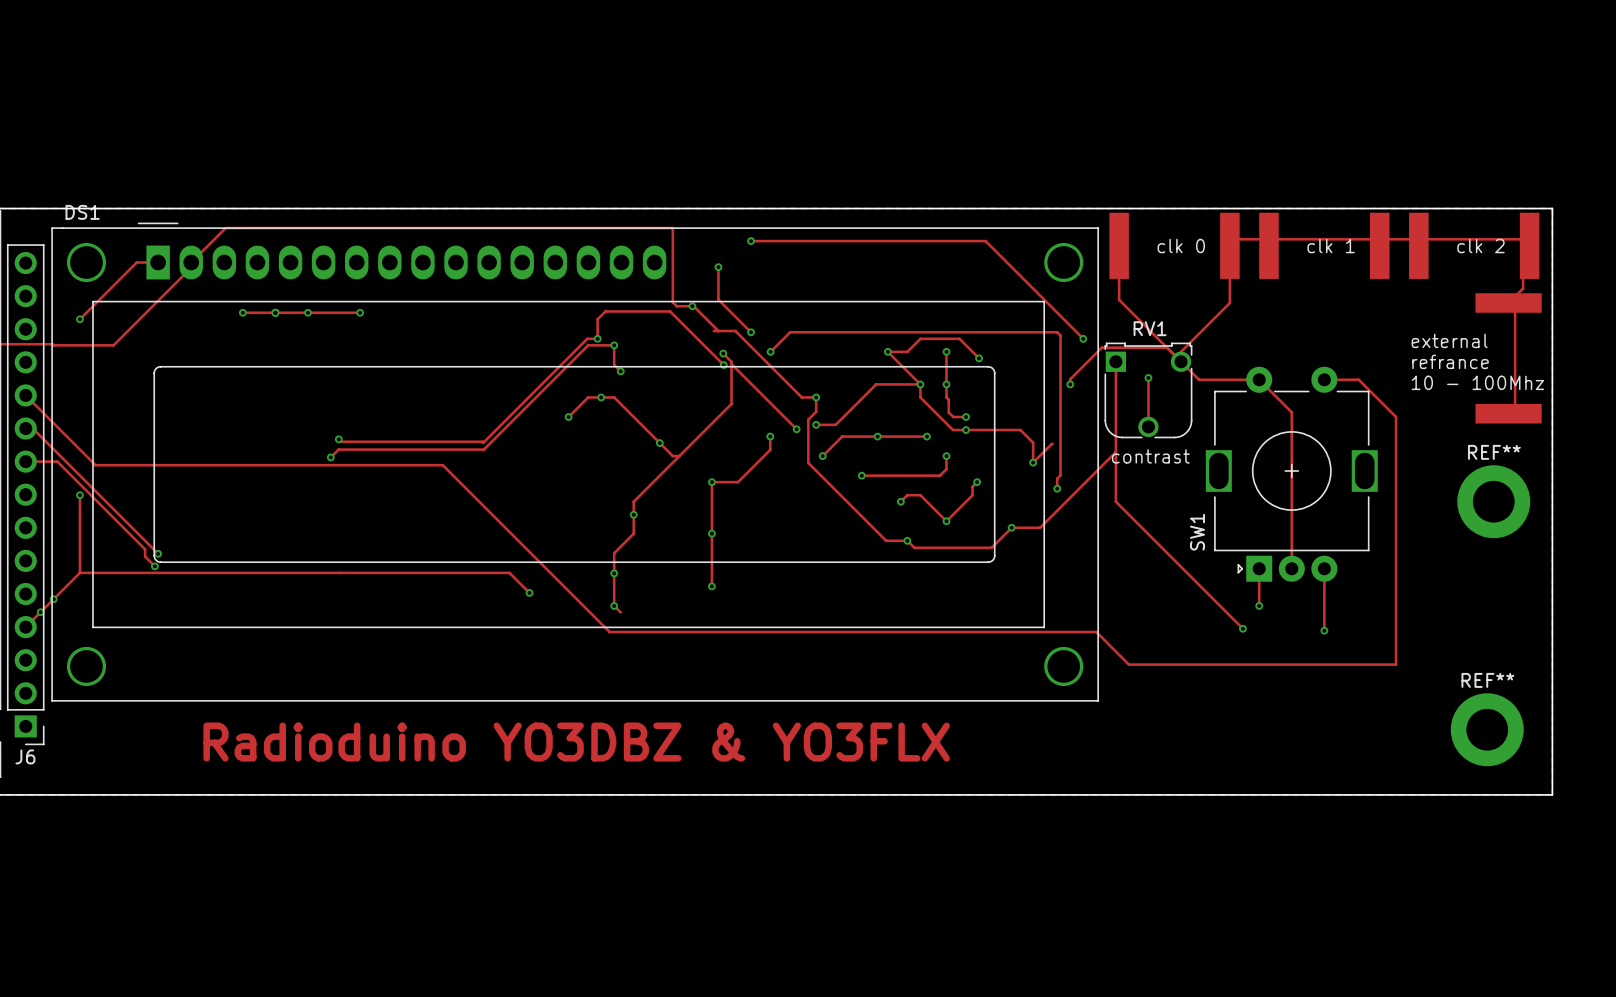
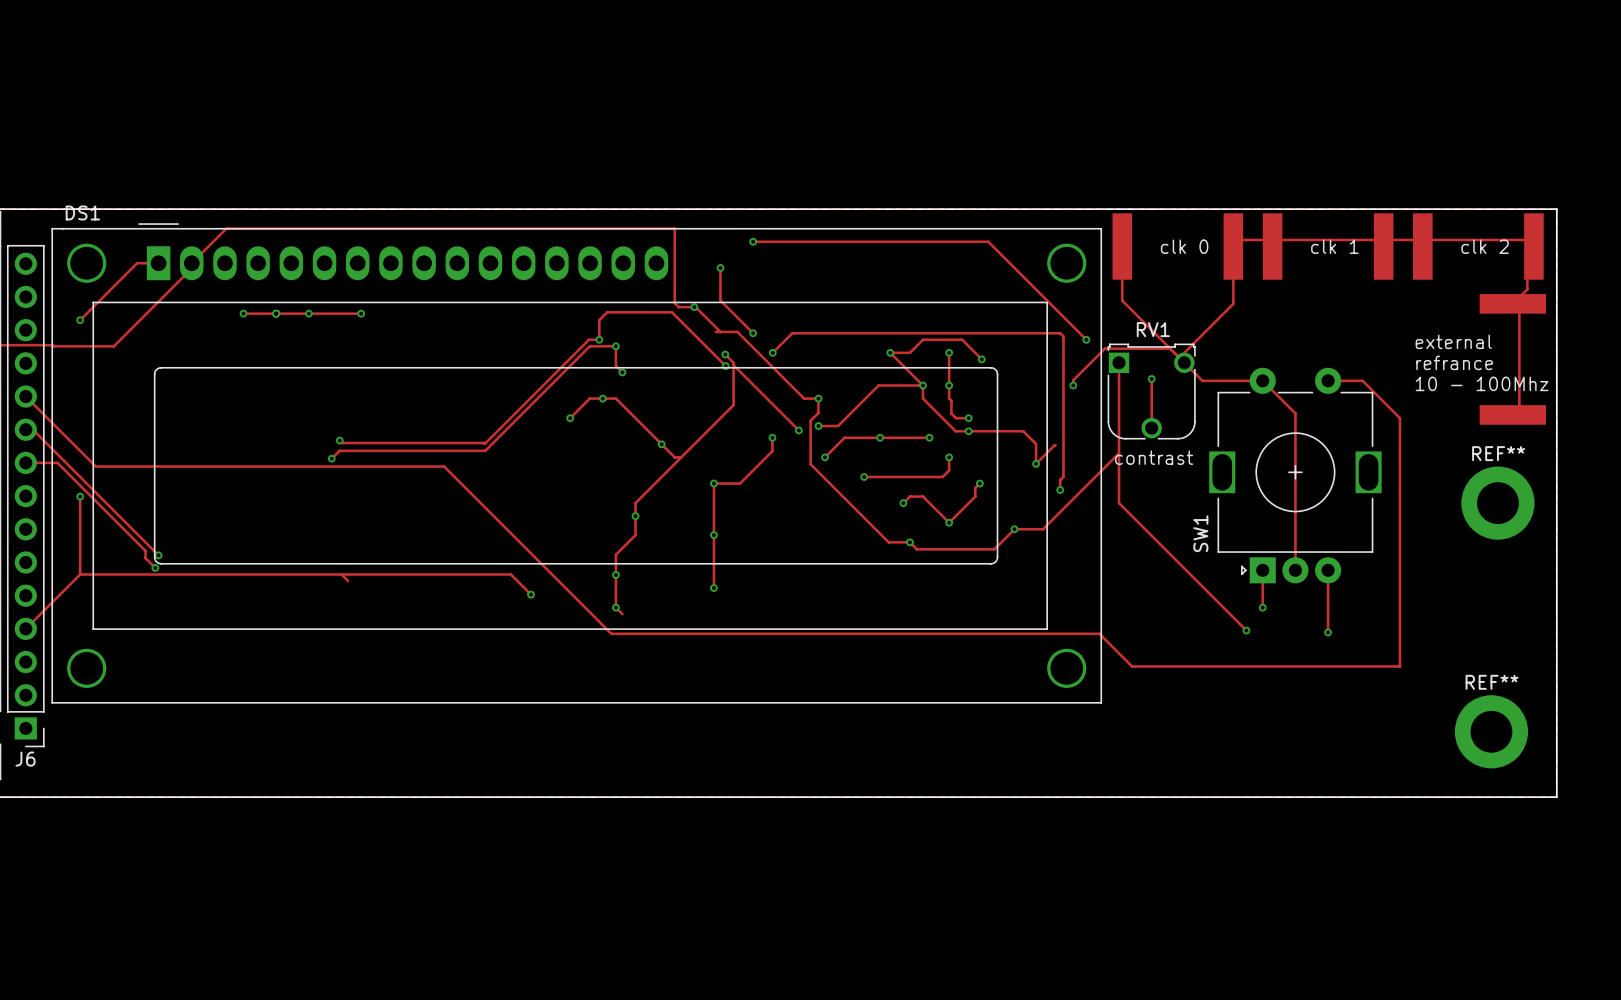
track: none -> (341, 574) (348, 581)
via: (53, 599) -> none
via: (40, 612) -> none
text: Radioduino YO3DBZ & YO3FLX (576, 742) -> none

